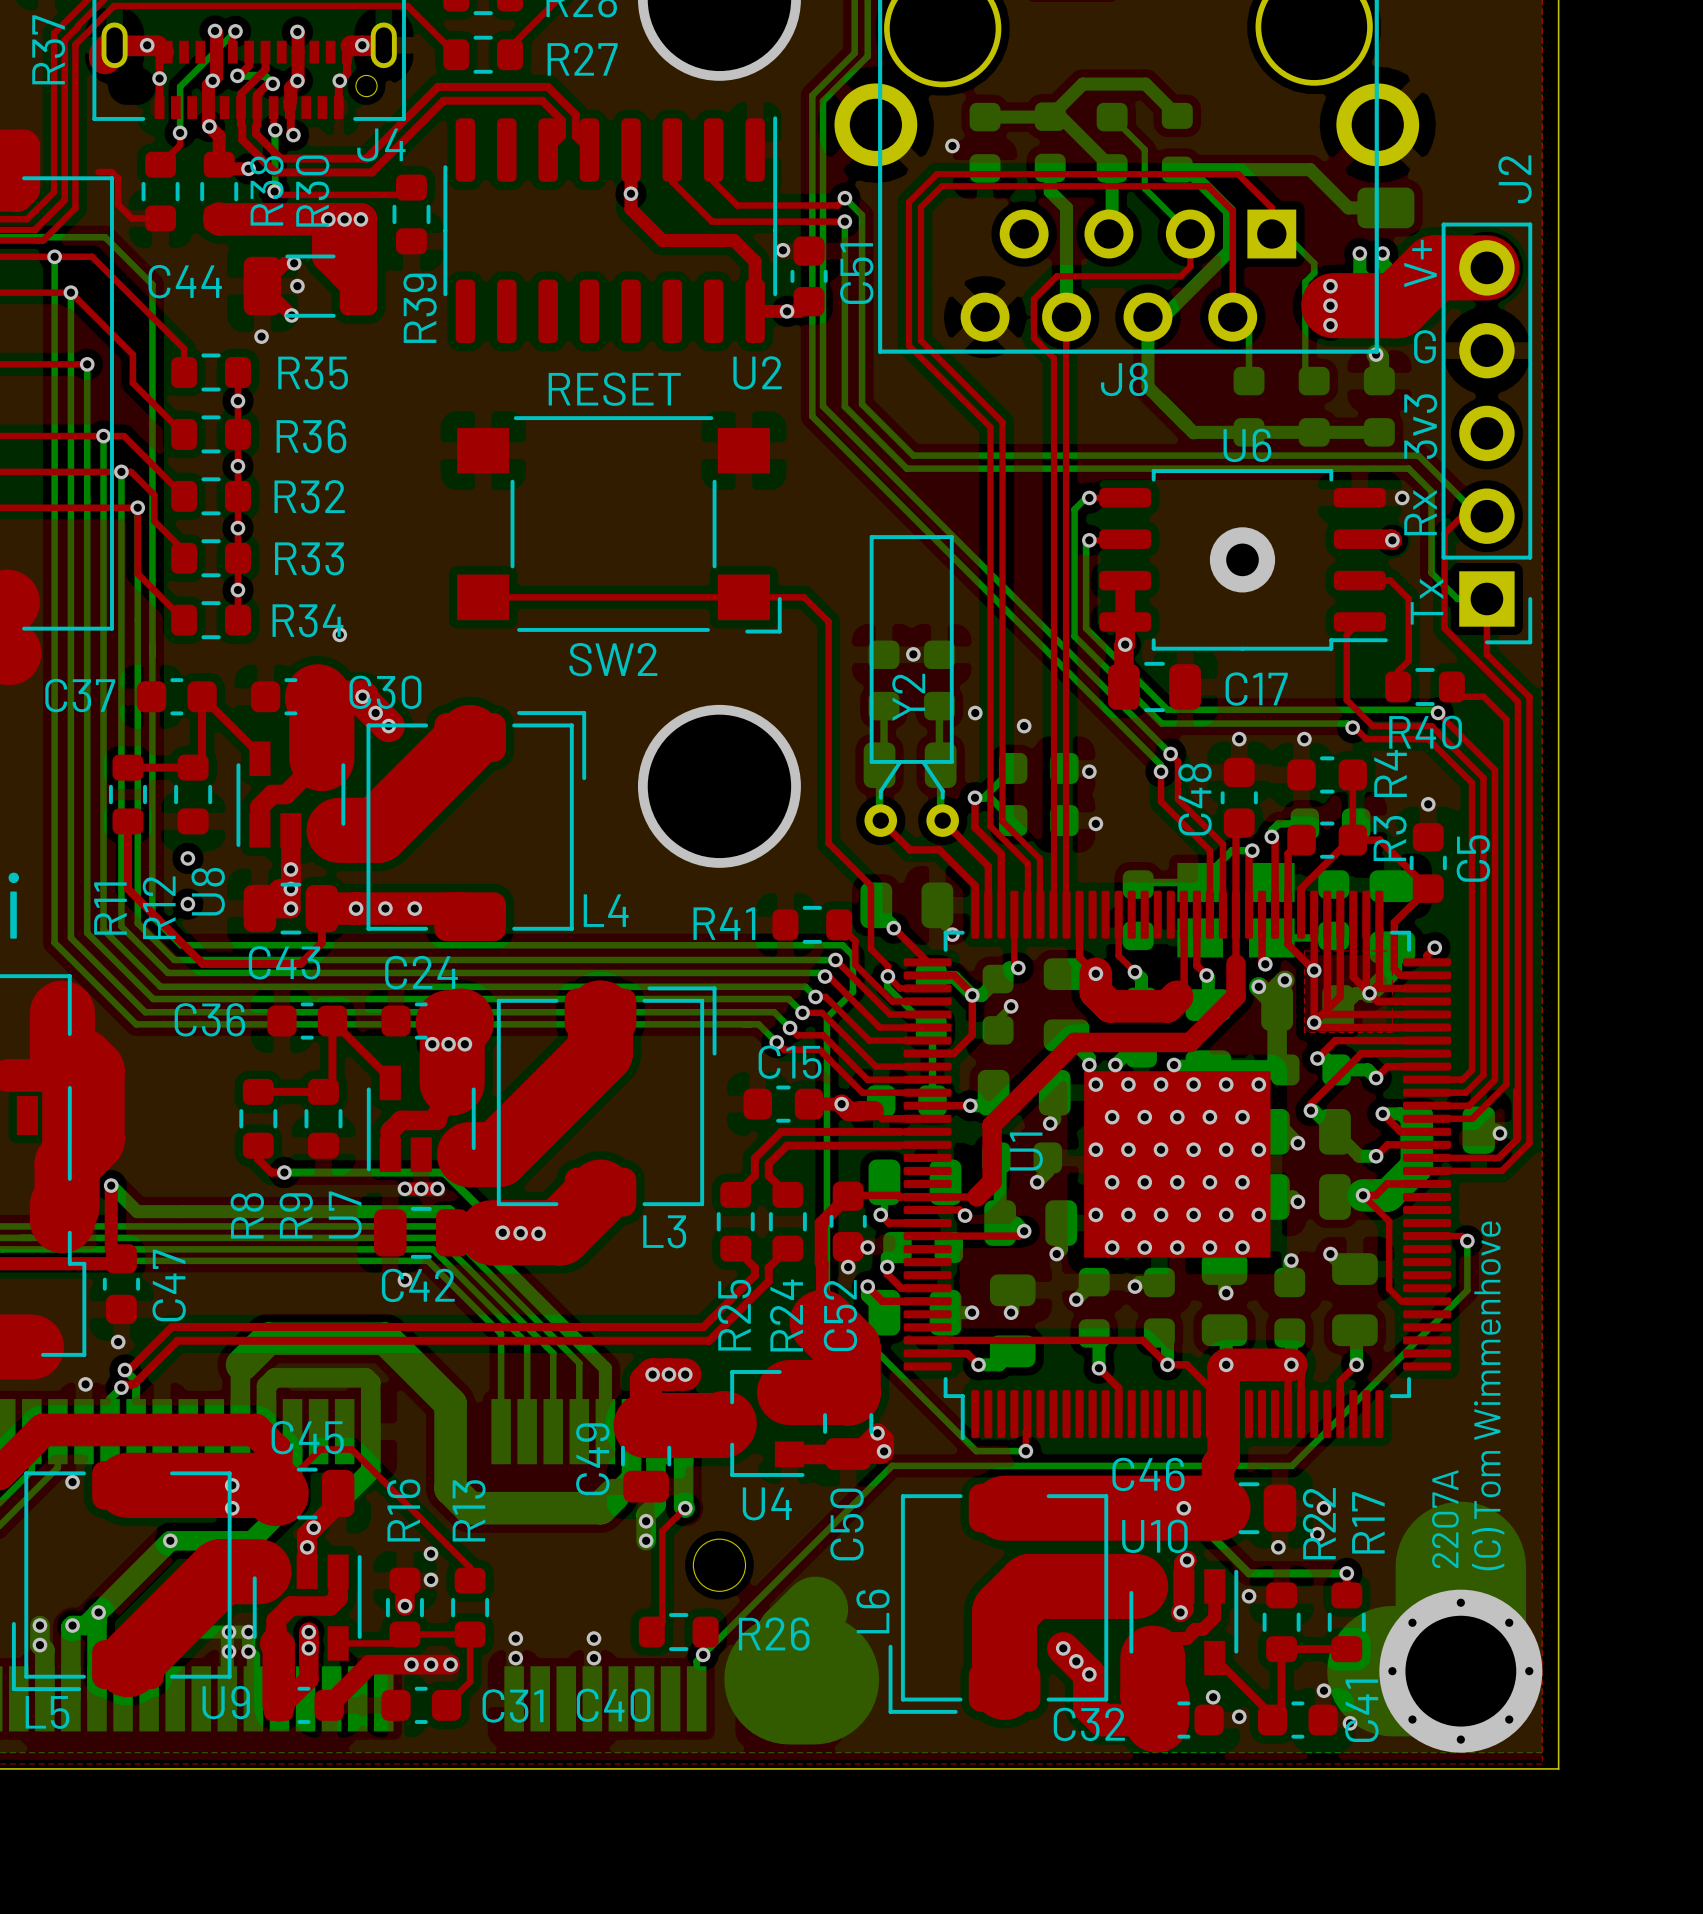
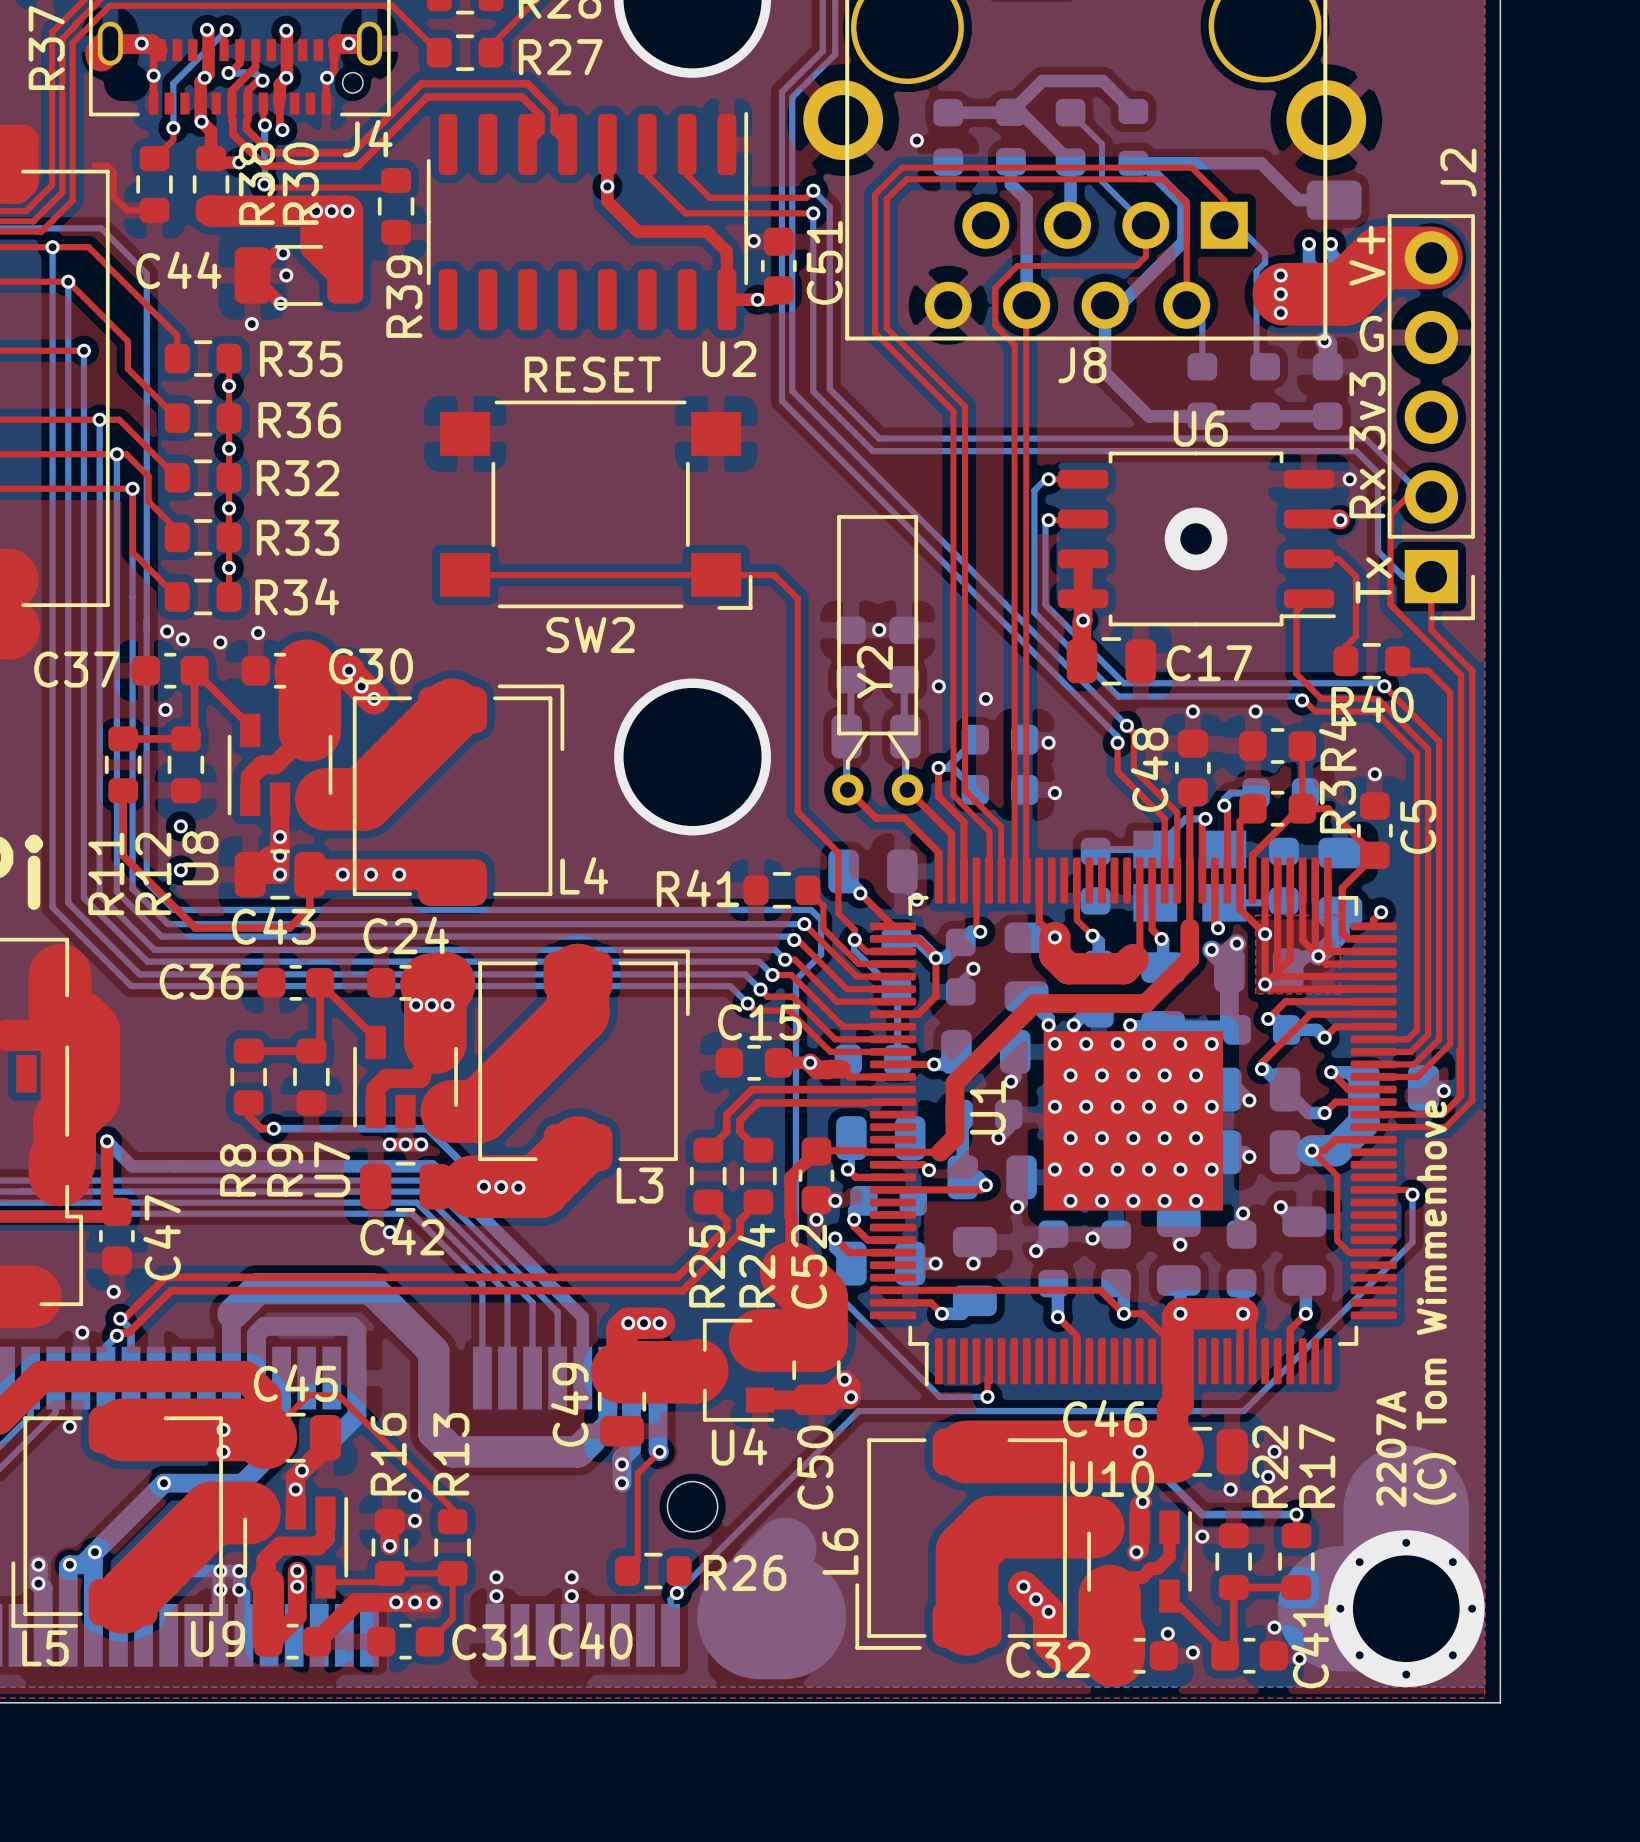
via: (339, 634) -> none
via: none -> (167, 631)
via: none -> (258, 633)
via: none -> (182, 639)
via: none -> (220, 642)
via: none -> (165, 709)

